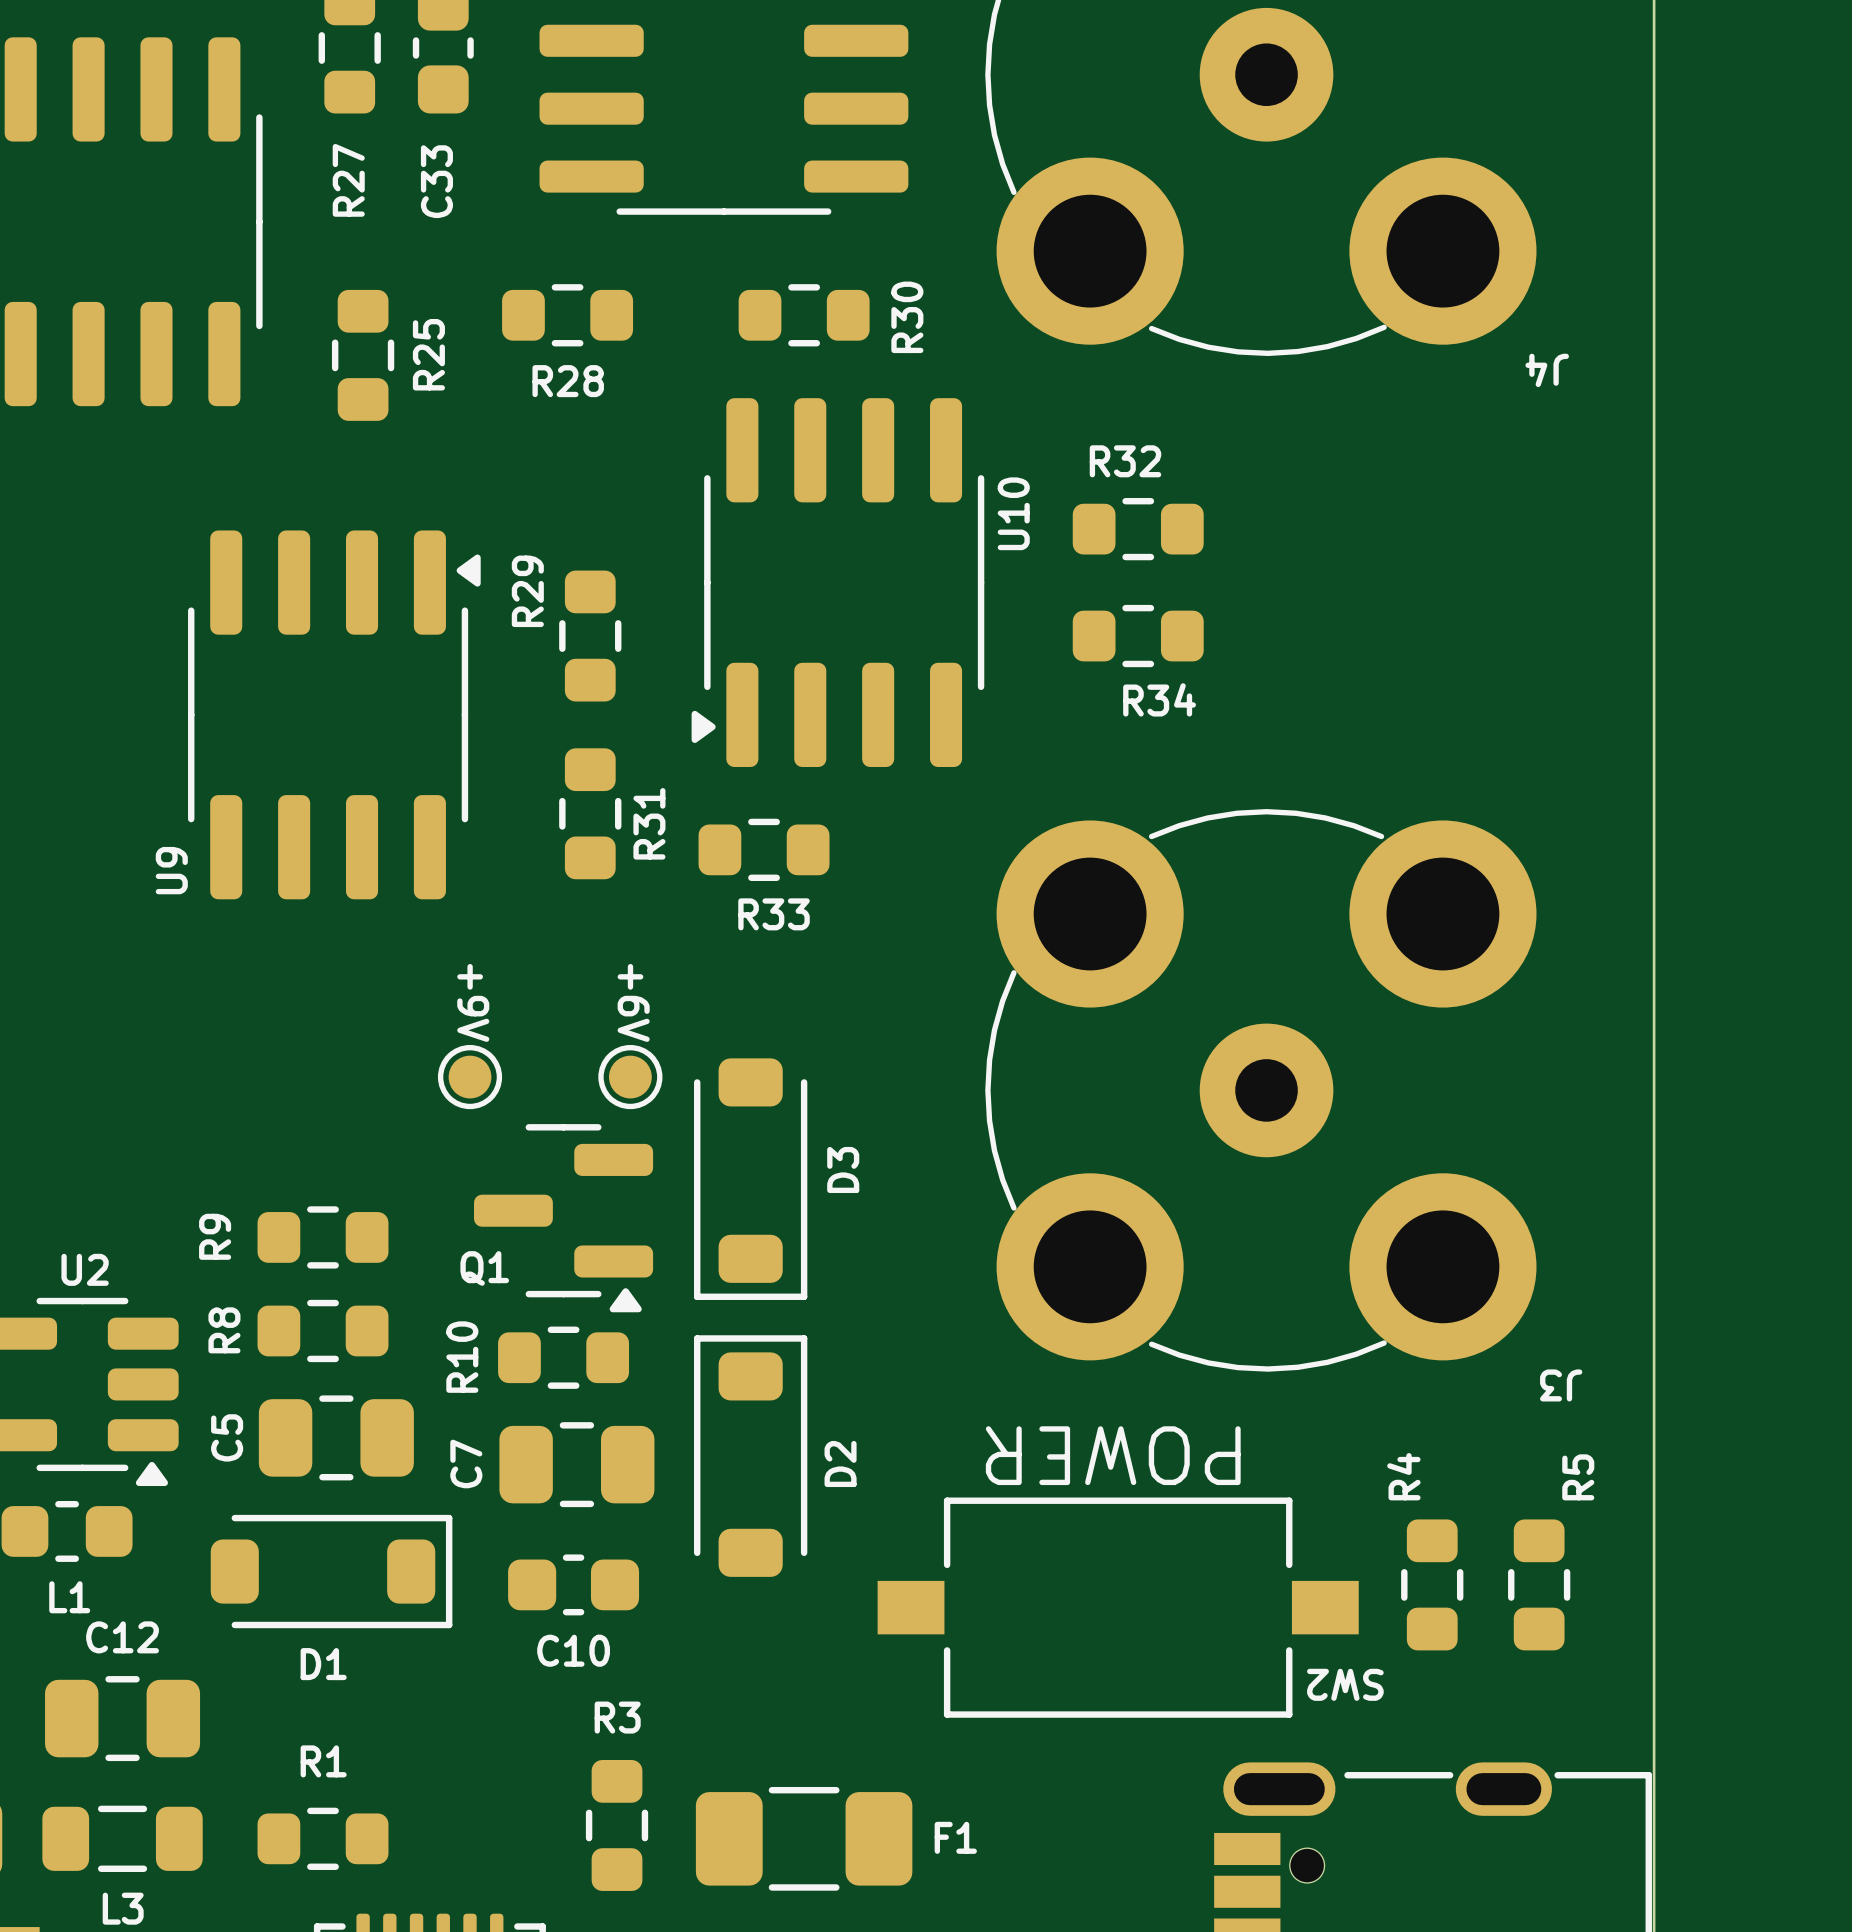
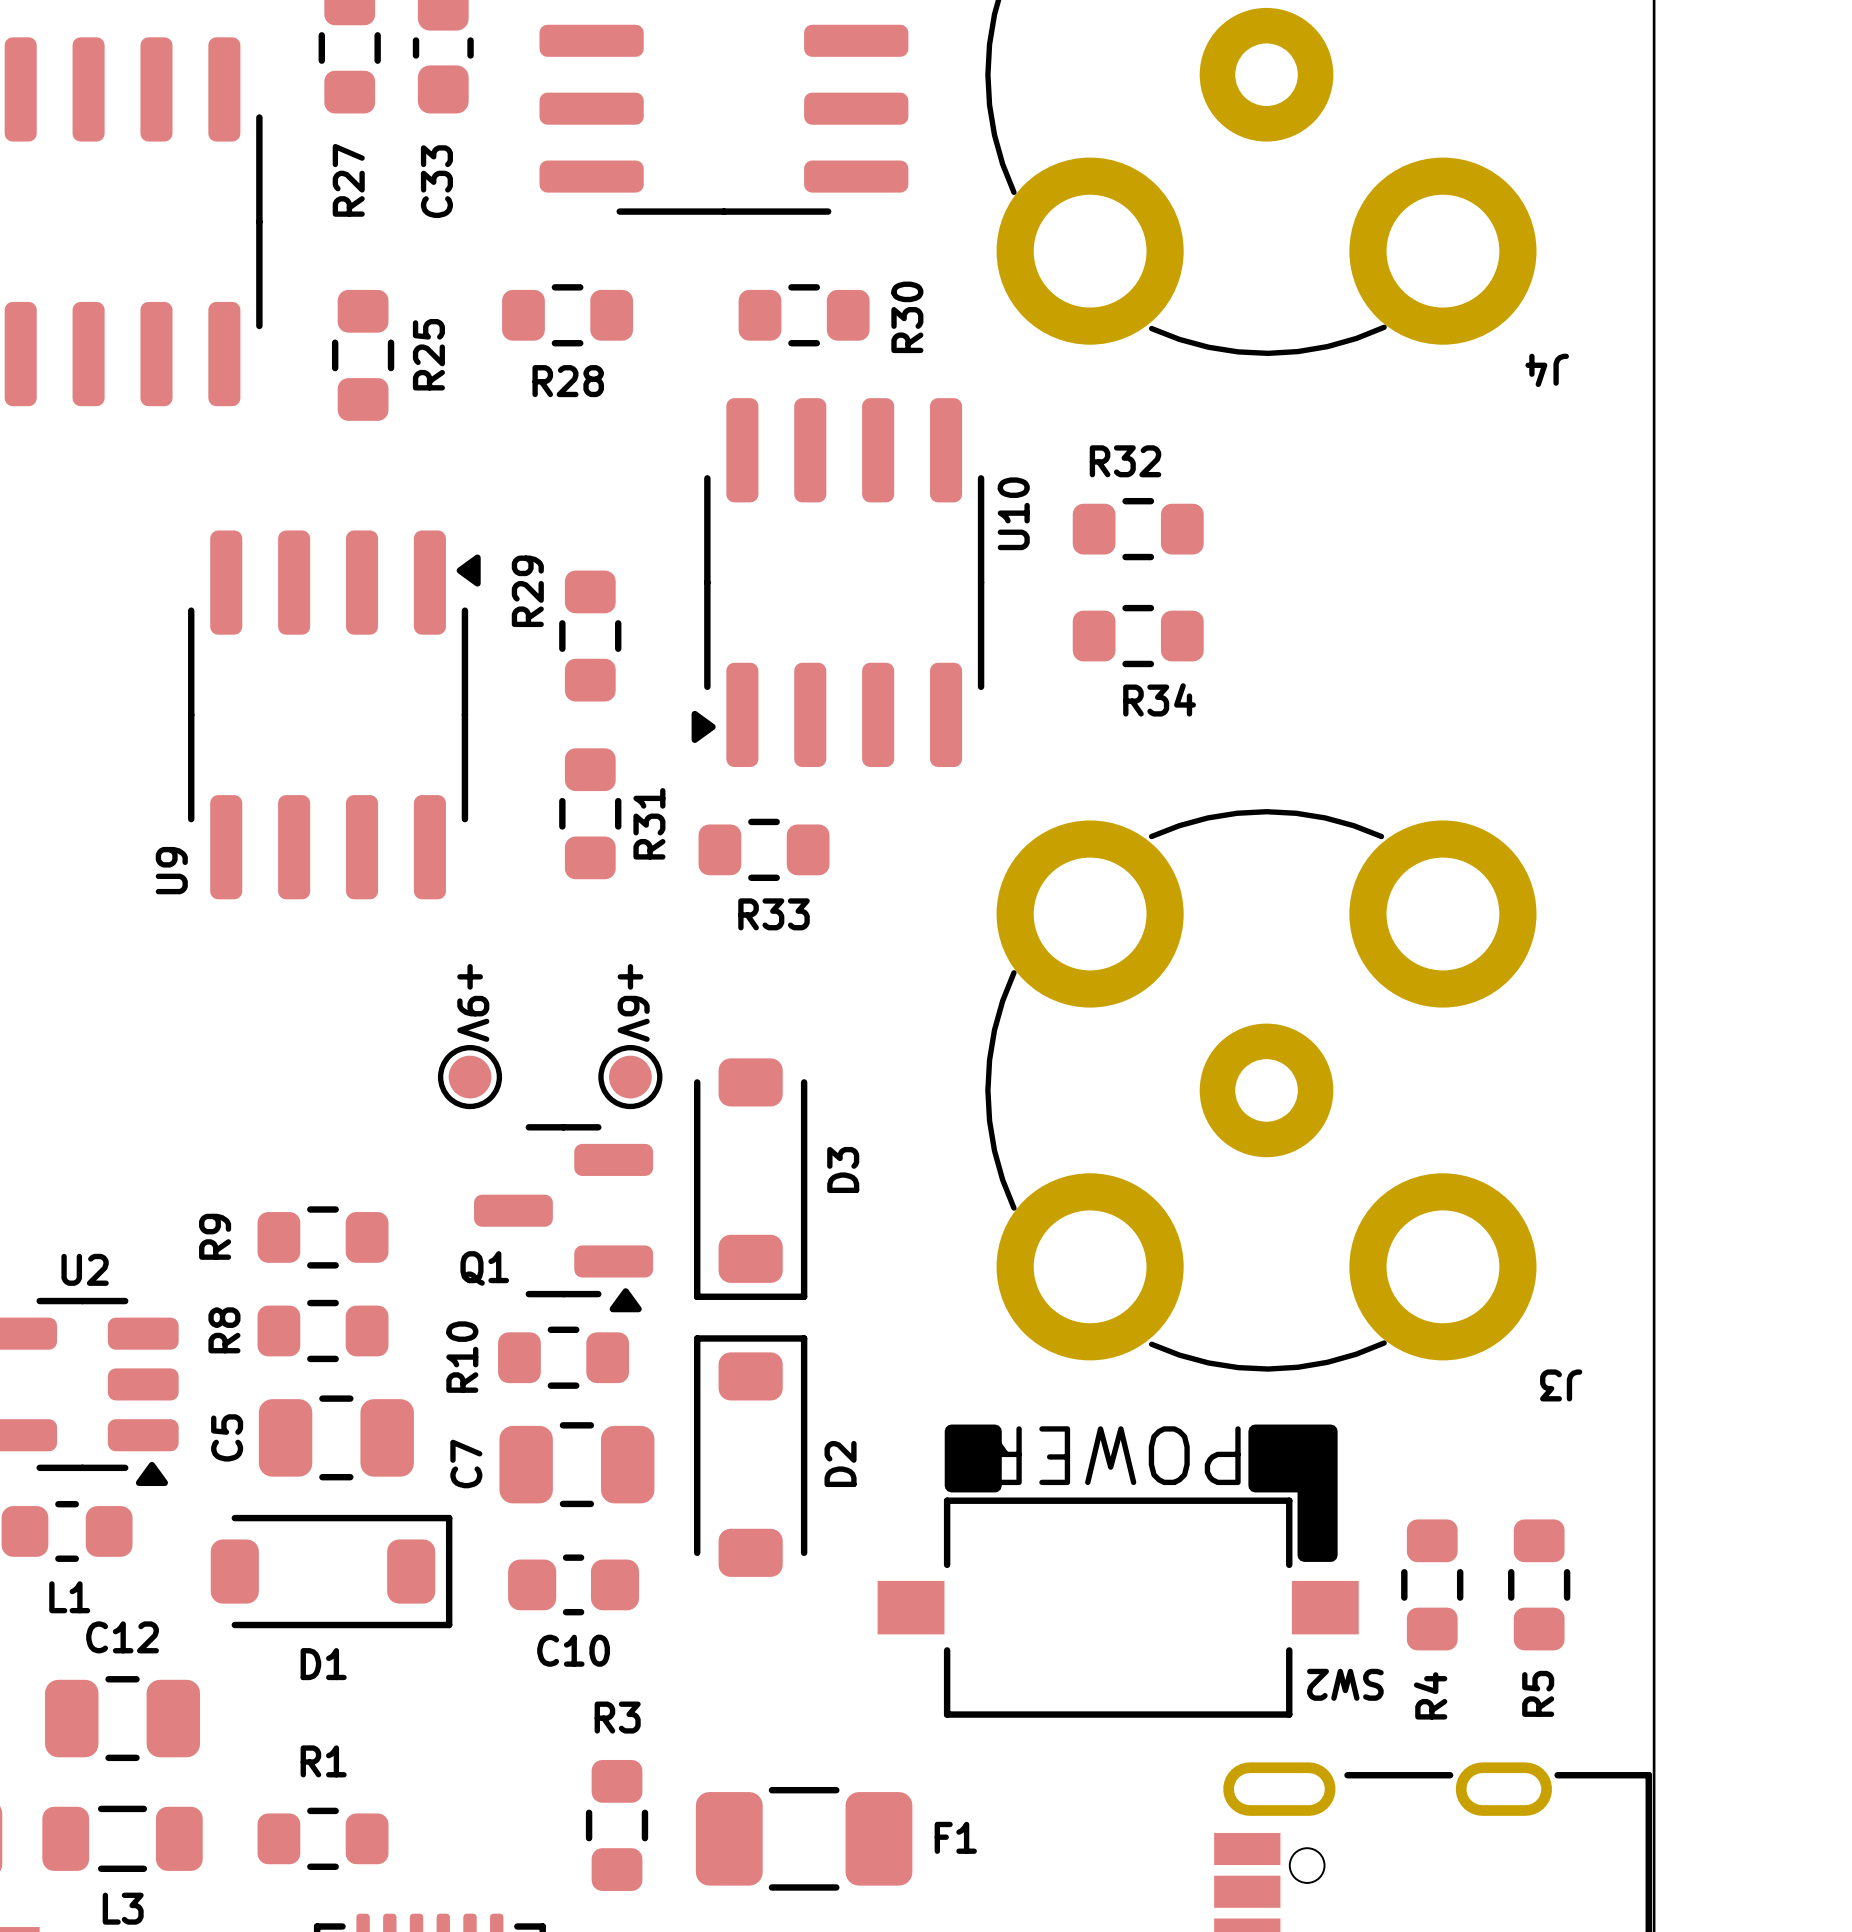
drawing: none -> [944, 1424, 1002, 1493]
drawing: none -> [1248, 1424, 1338, 1562]
R4 name position: R4 (1403, 1476) -> R4 (1430, 1695)
R5 name position: R5 (1578, 1477) -> R5 (1538, 1693)

